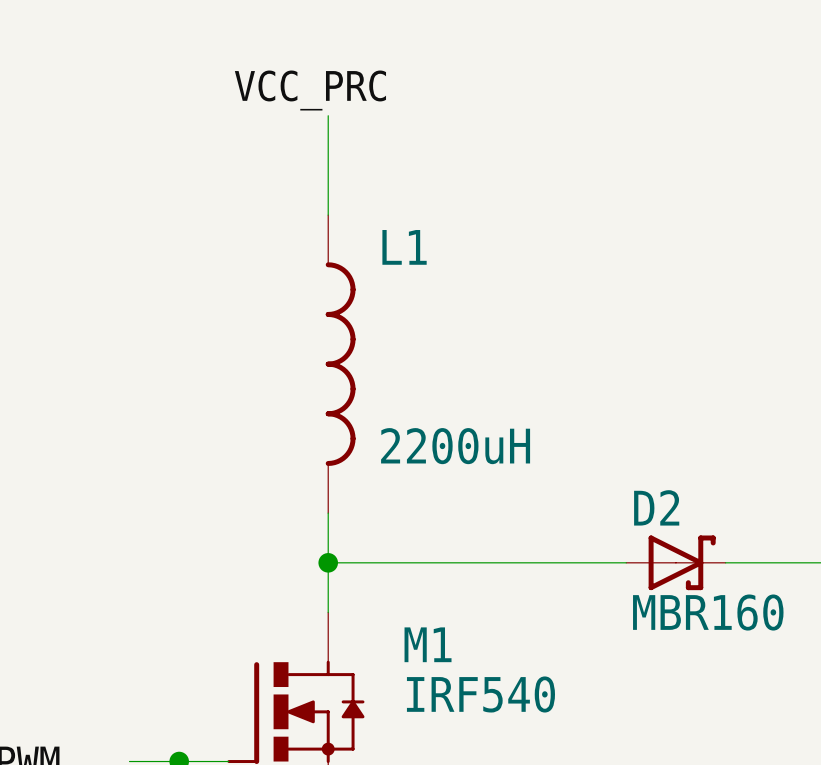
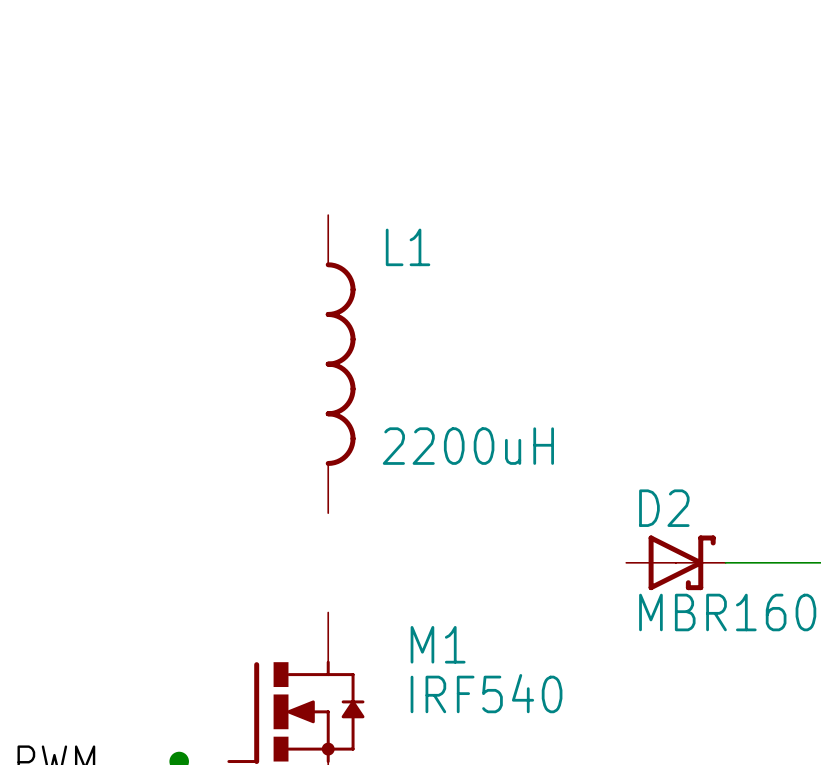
label: VCC_PRC (310, 90) -> none
wire: (328, 115) (328, 215) -> none
wire: (328, 513) (328, 612) -> none
wire: (328, 562) (626, 562) -> none
junction: (328, 562) -> none
wire: (129, 761) (228, 761) -> none

